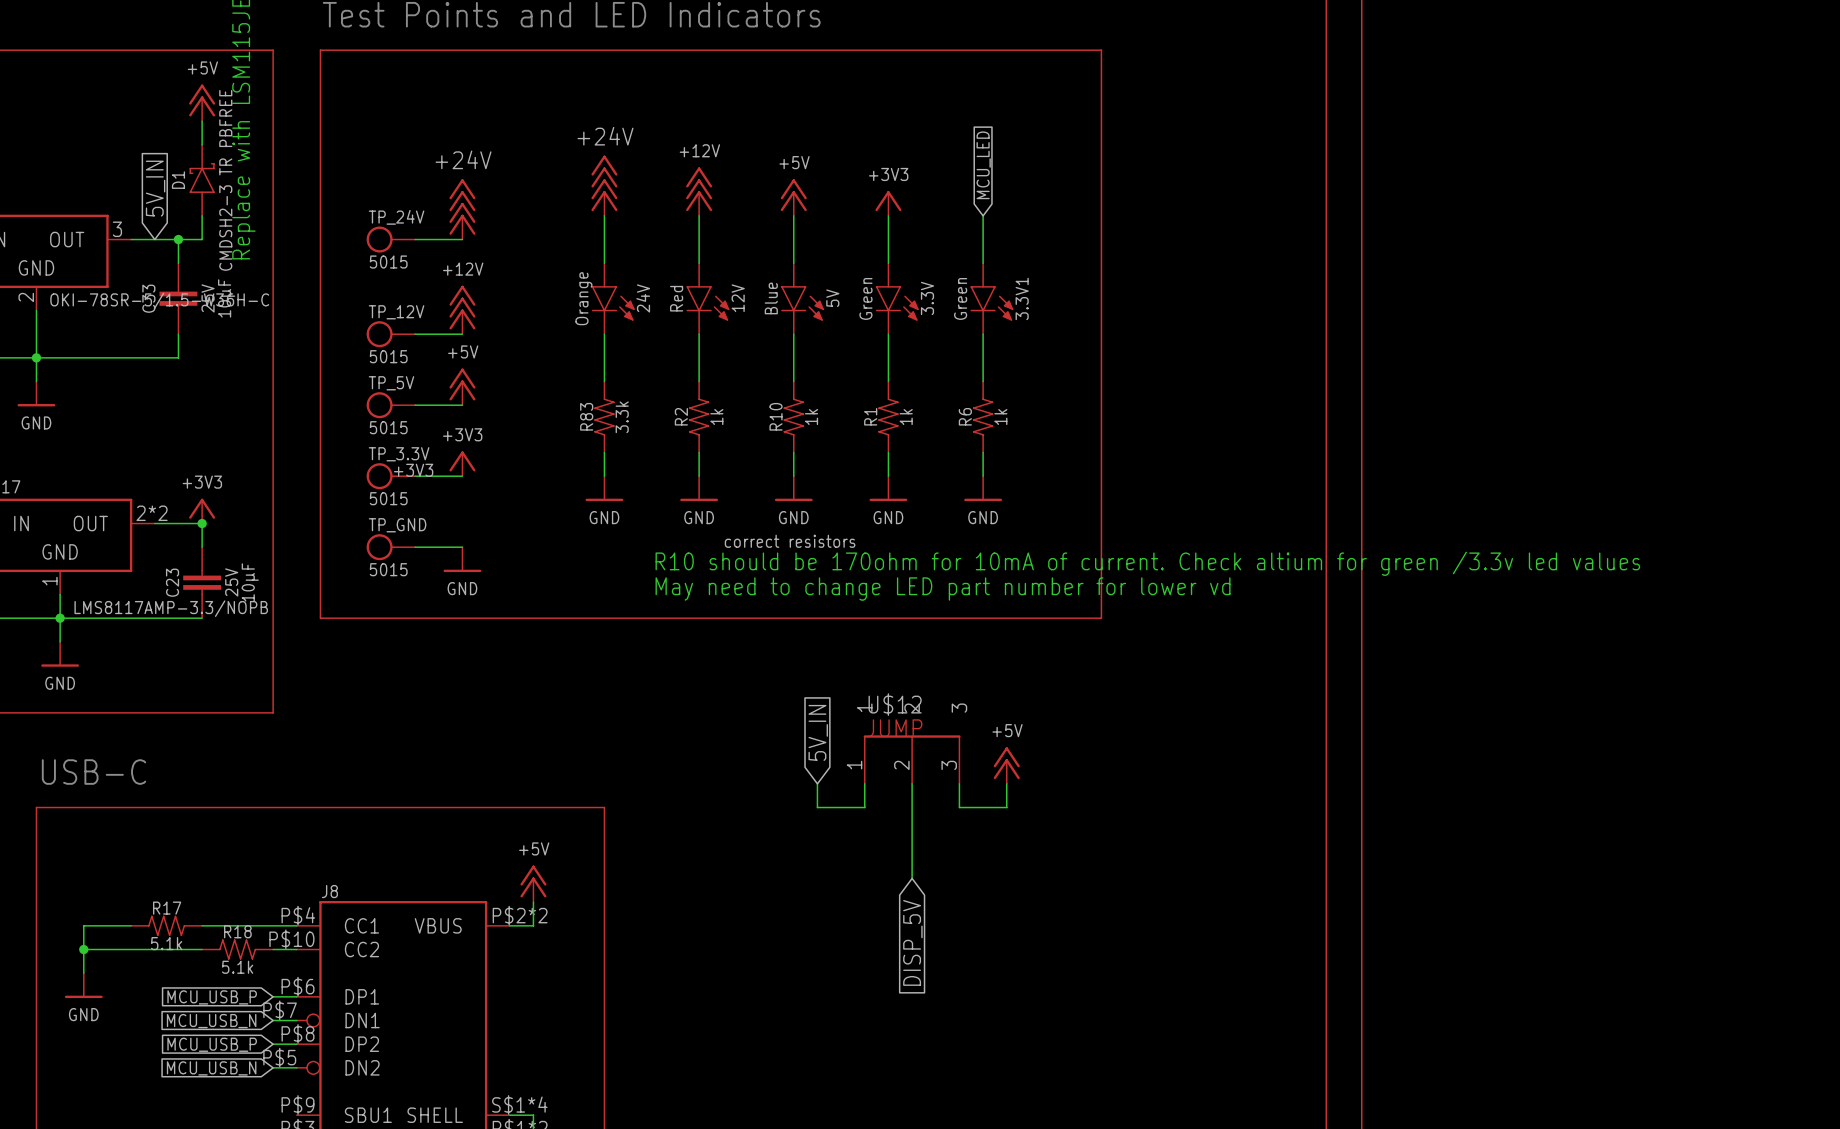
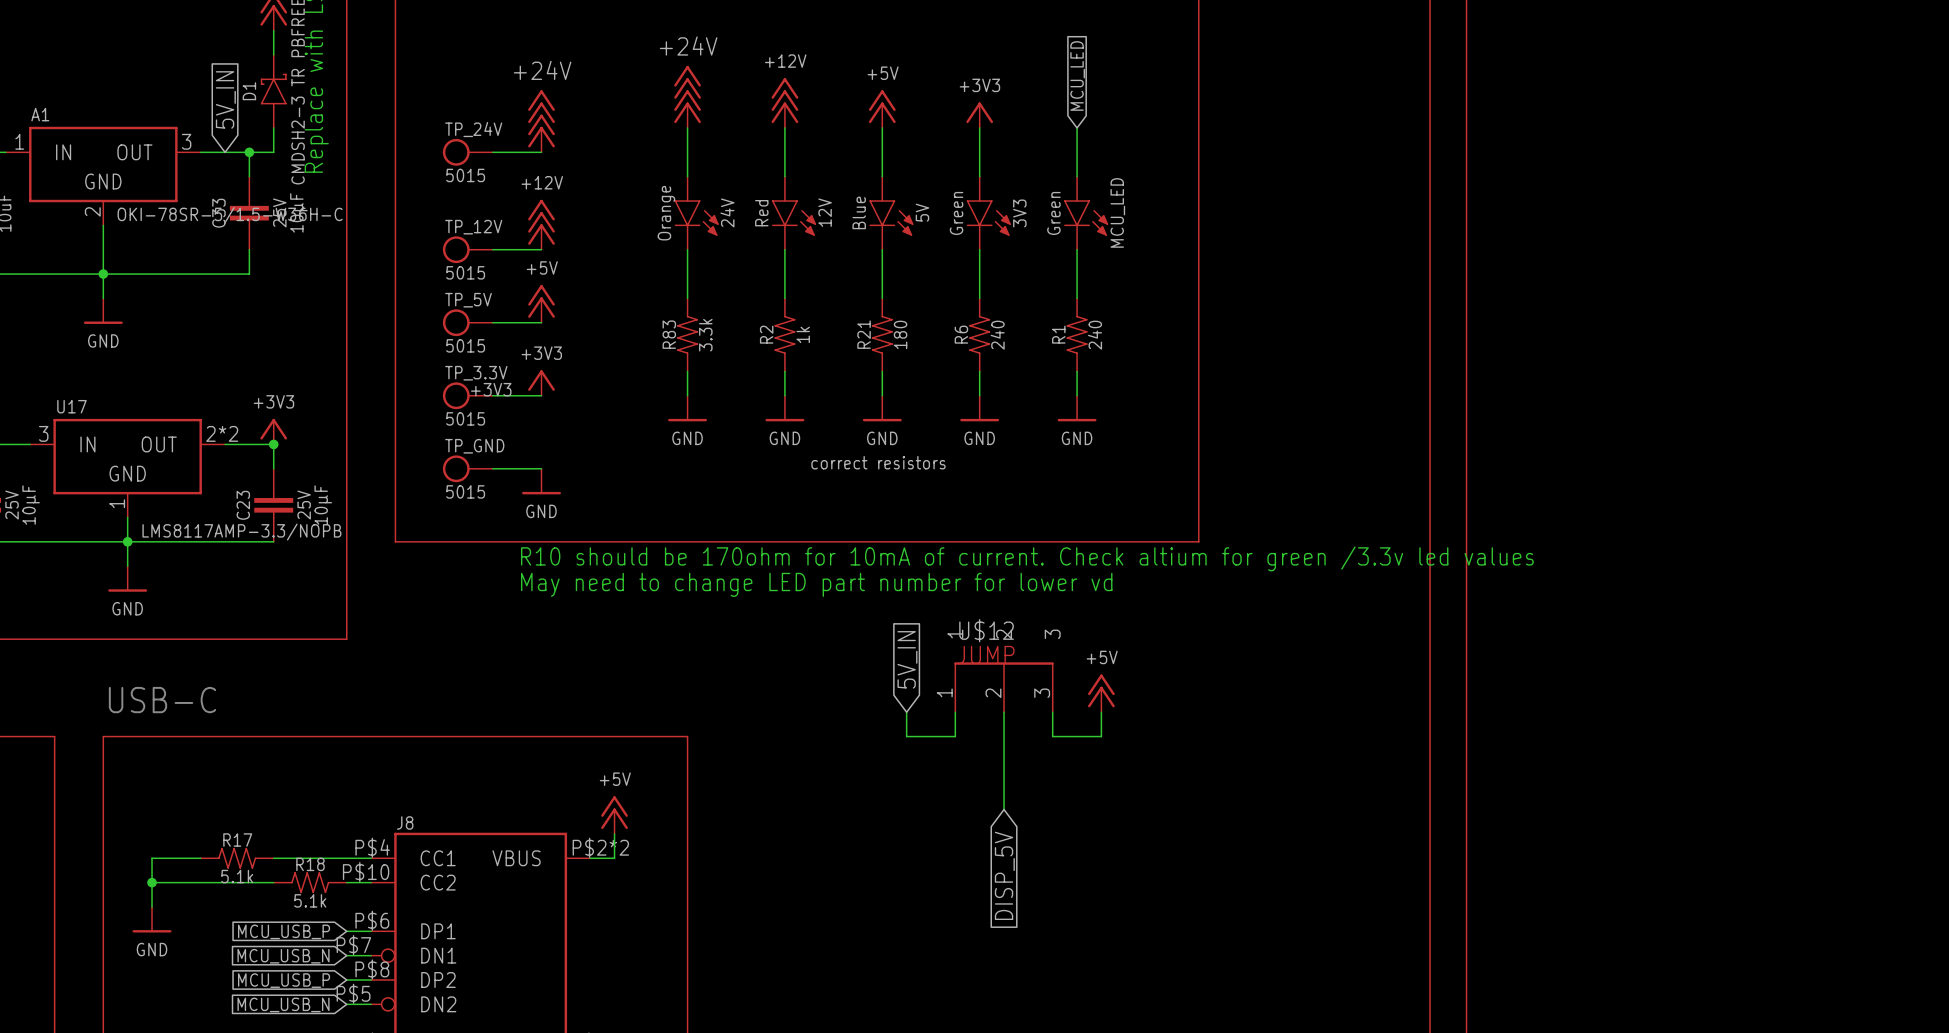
3.3V name: 3.3V (927, 298) -> 3V3 (1019, 213)
3.3V1 name: 3.3V1 (1022, 298) -> MCU_LED (1117, 212)
R10 name: R10 (776, 416) -> R21 (864, 334)
R1 name: R1 (870, 416) -> R6 (961, 334)
R6 name: R6 (965, 416) -> R1 (1058, 334)
R10 text: 1k (811, 417) -> 180 (900, 334)
R1 text: 1k (906, 417) -> 240 (997, 335)
R6 text: 1k (1000, 417) -> 240 (1095, 335)
text position: R10 should be 170ohm for 10mA of current. Check altium for green /3.3v led values (1147, 563) -> R10 should be 170ohm for 10mA of current. Check altium for green /3.3v led values (1027, 558)
text position: May need to change LED part number for lower vd (943, 589) -> May need to change LED part number for lower vd (816, 584)

